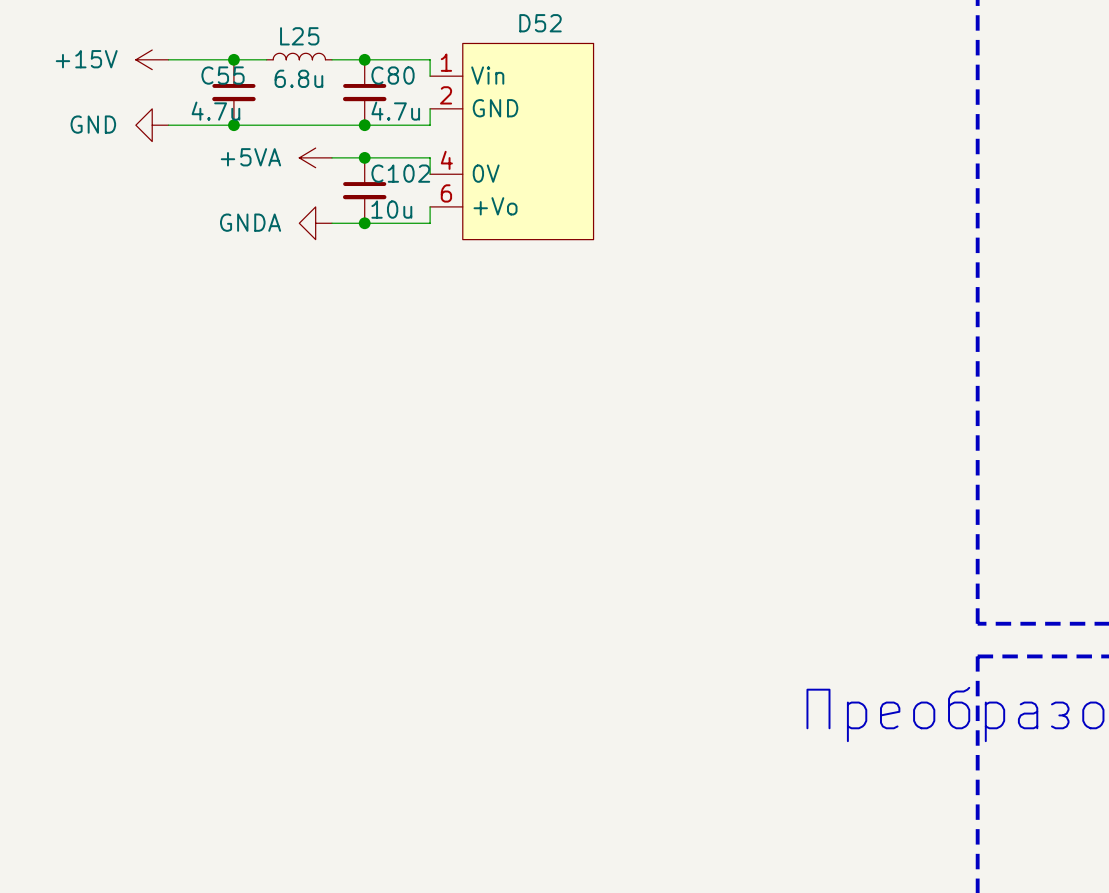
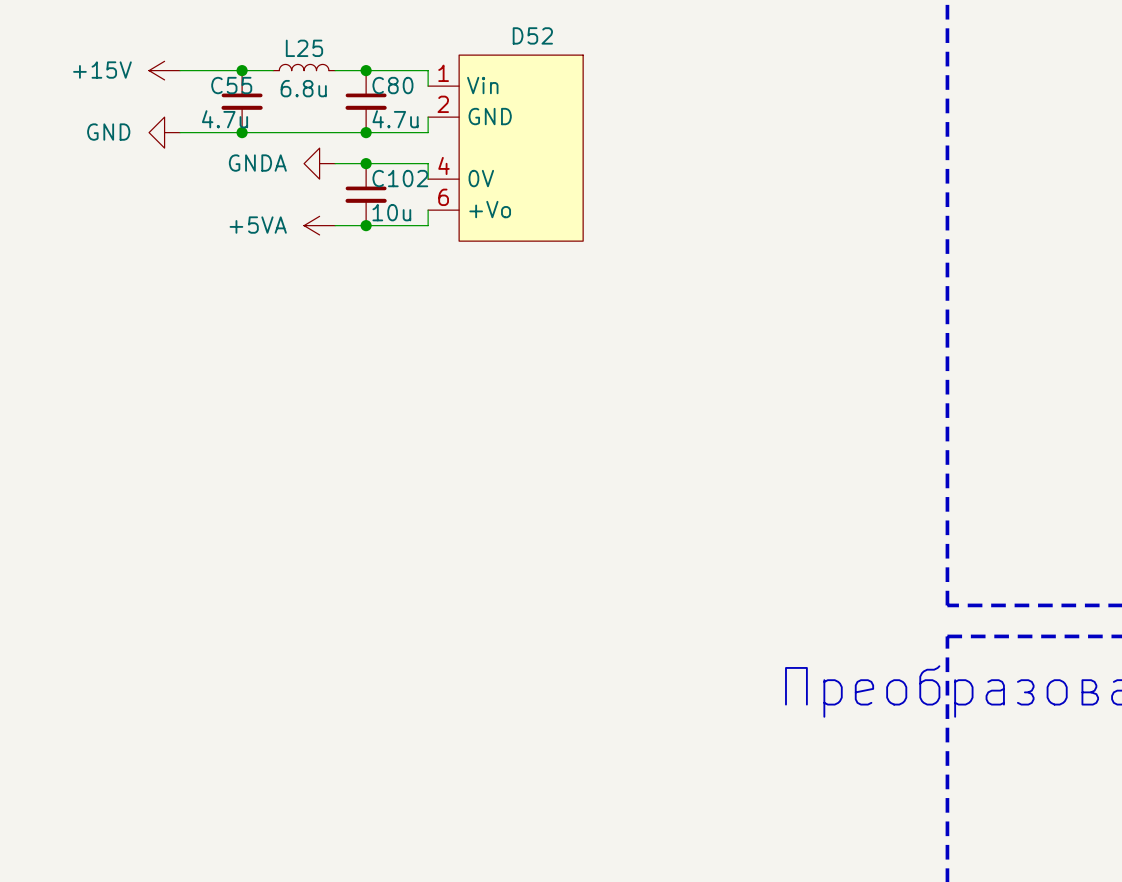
power symbol: +5VA (315, 157) -> GNDA (319, 163)
power symbol: GNDA (315, 223) -> +5VA (319, 225)

